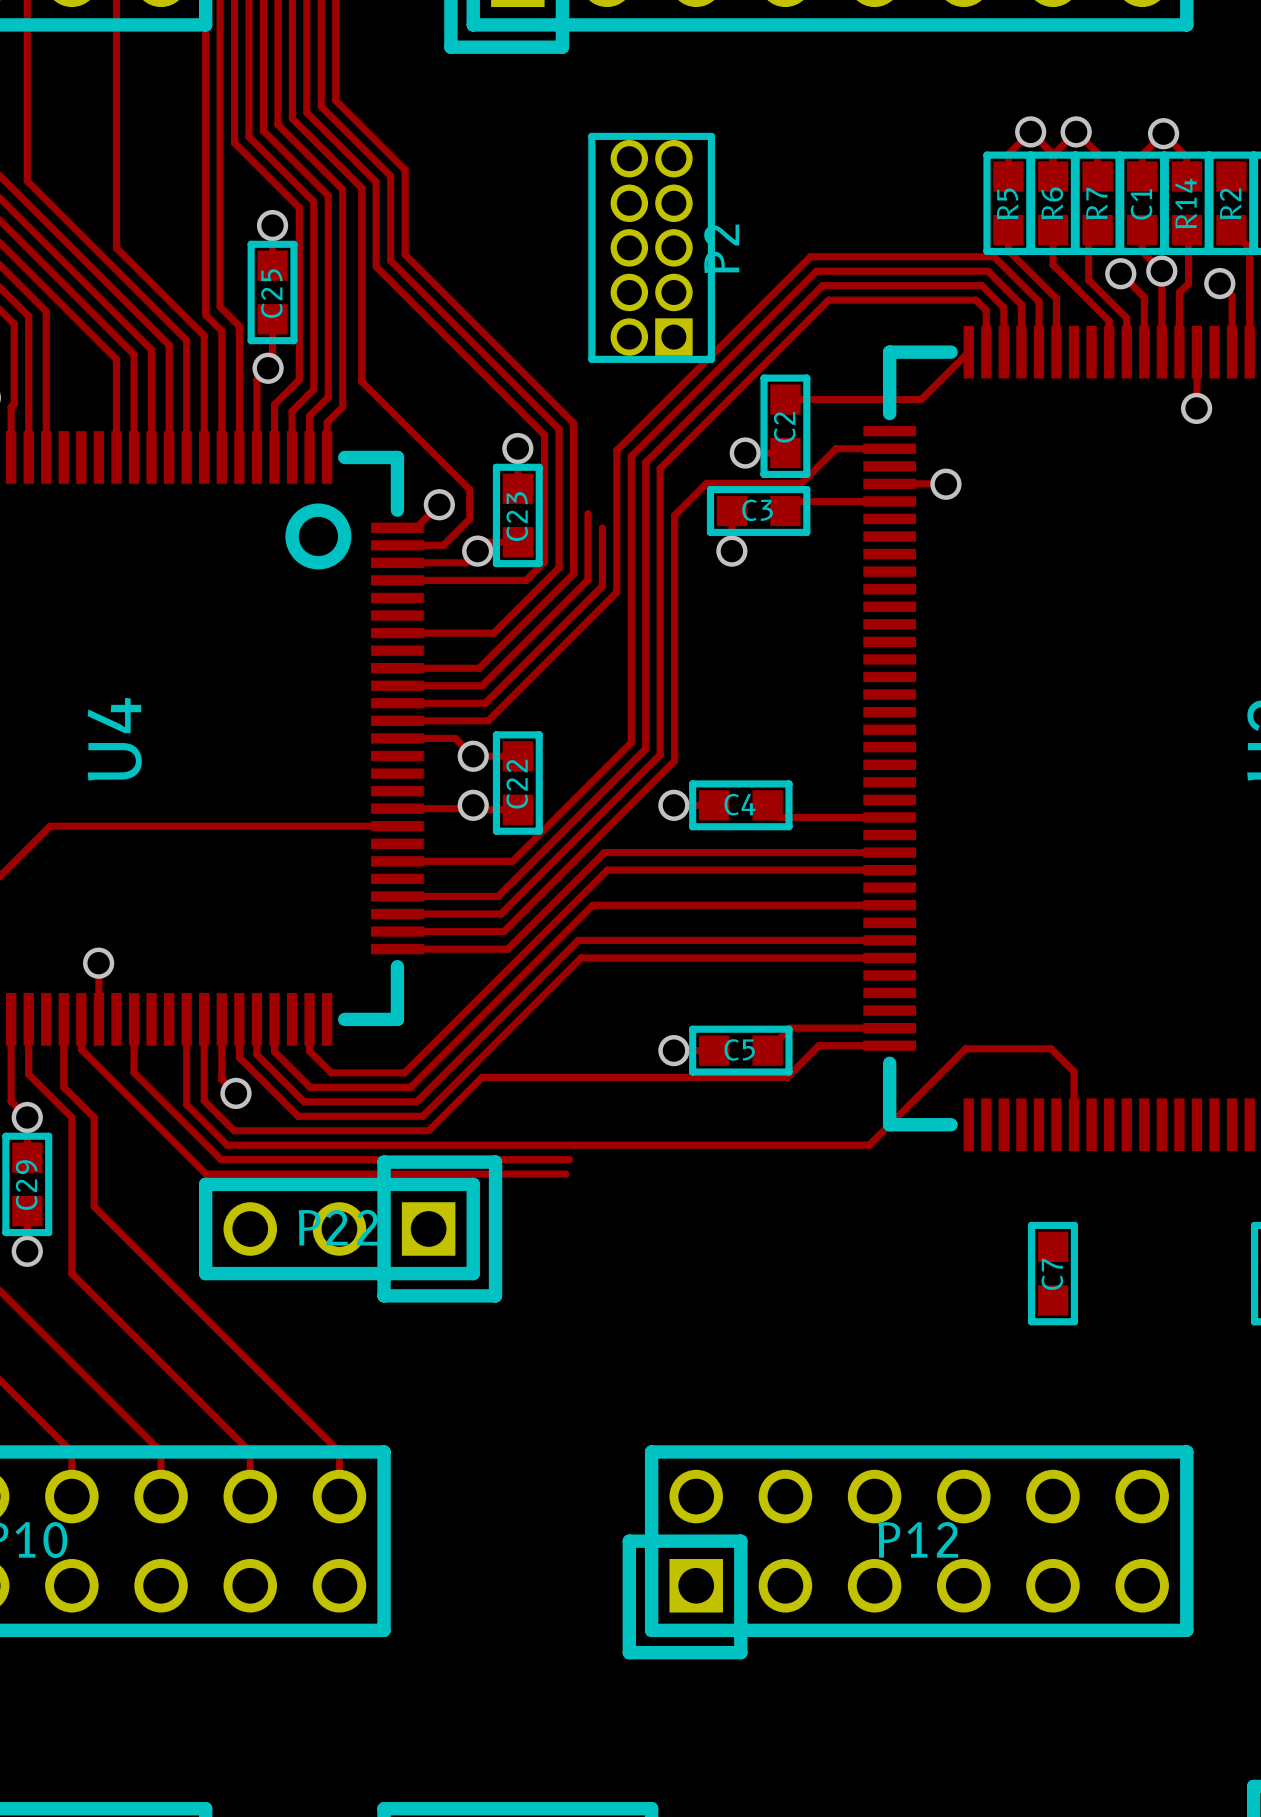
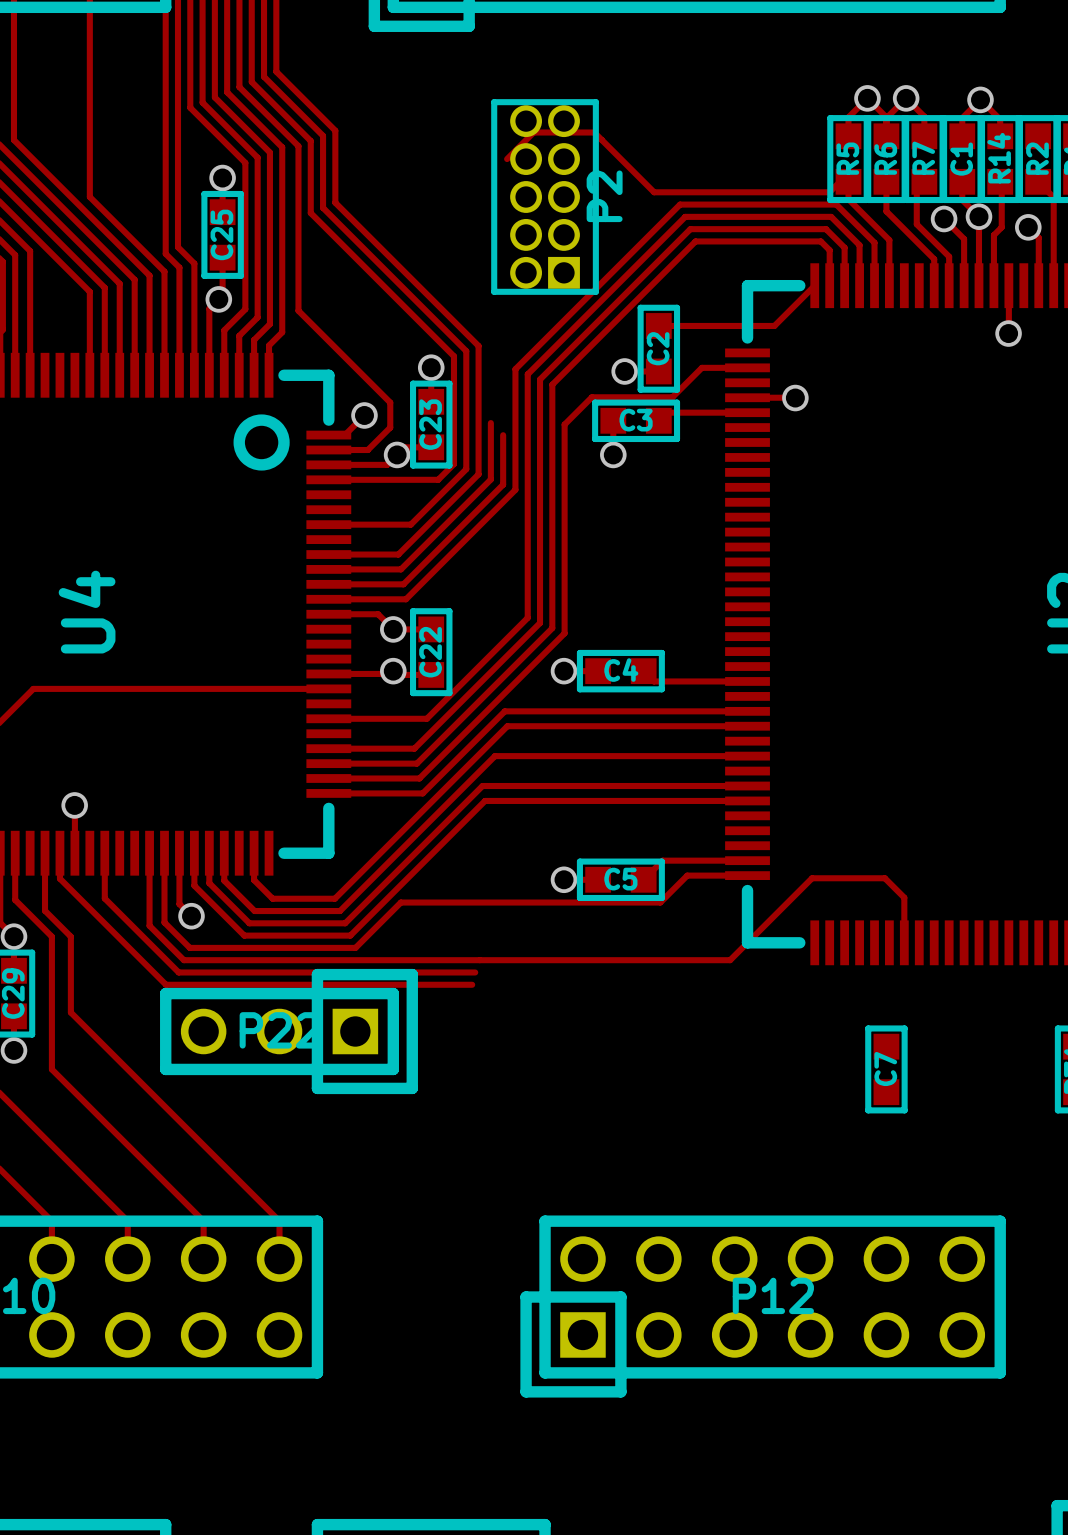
track: none -> (507, 159) (533, 132) (594, 132) (654, 192) (829, 192) (840, 181) (848, 181)

